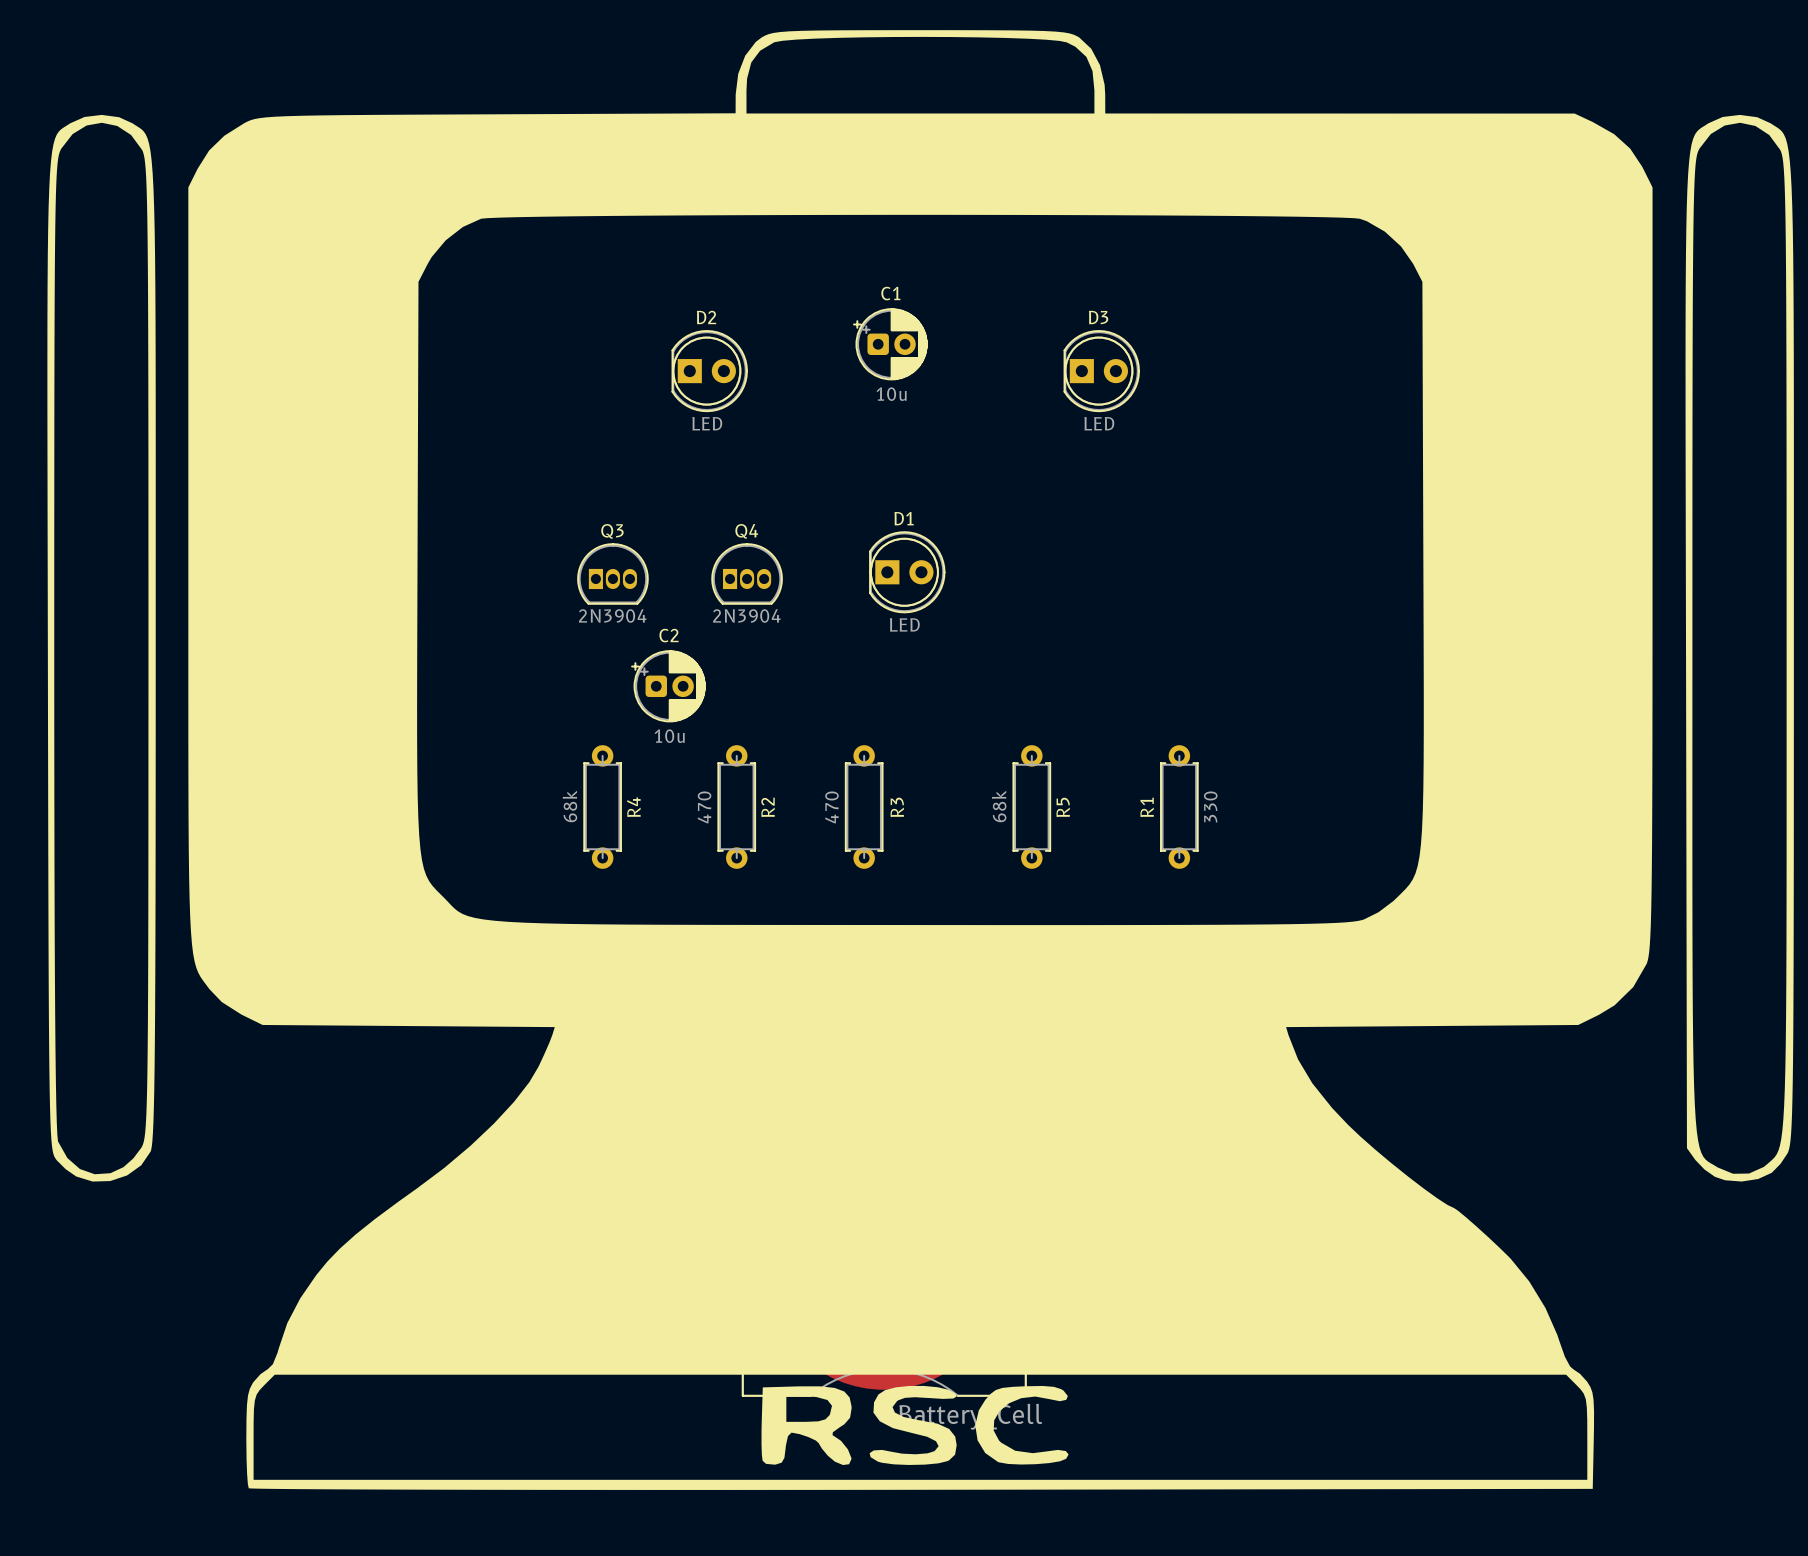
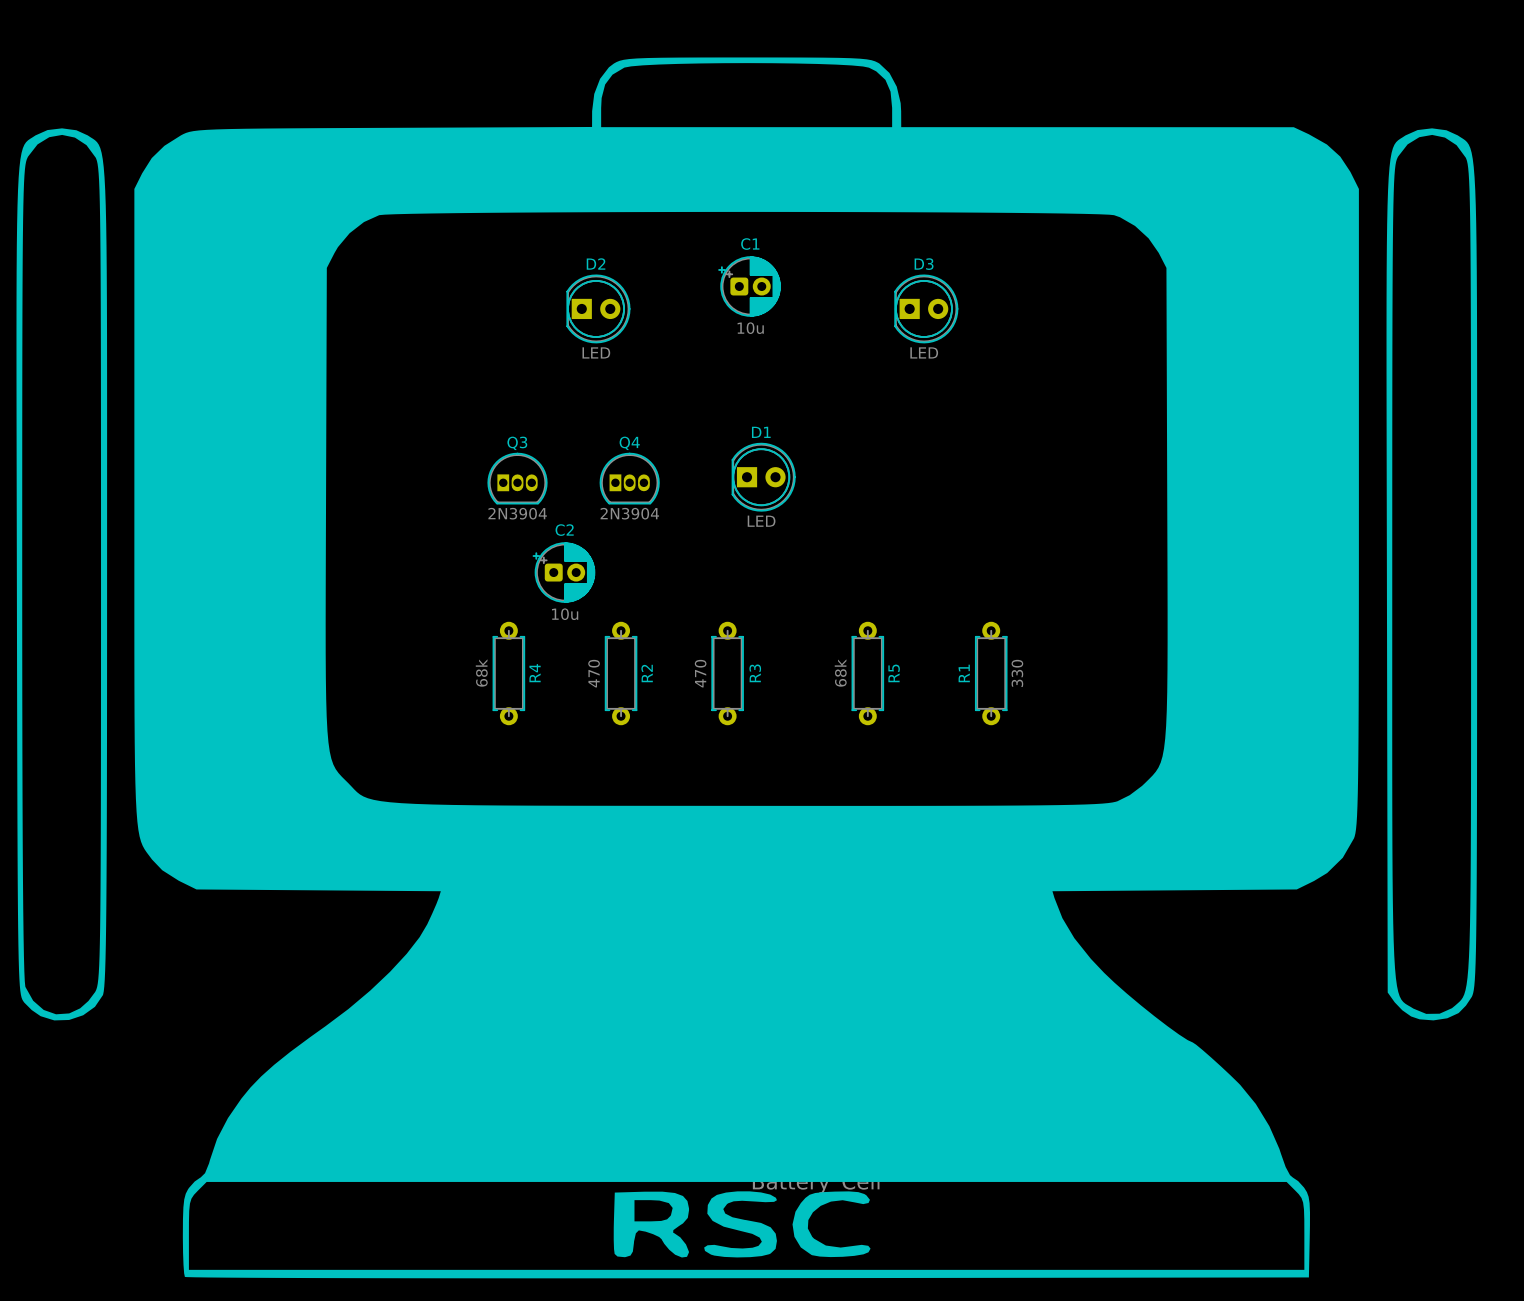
drawing position: (920, 760) -> (746, 667)

